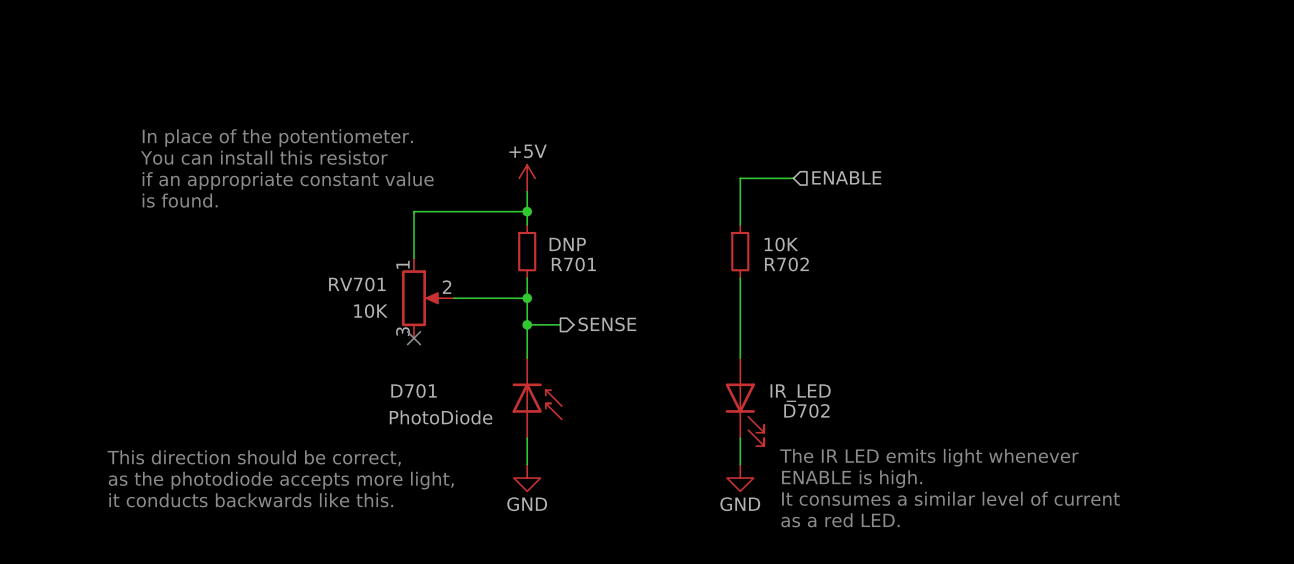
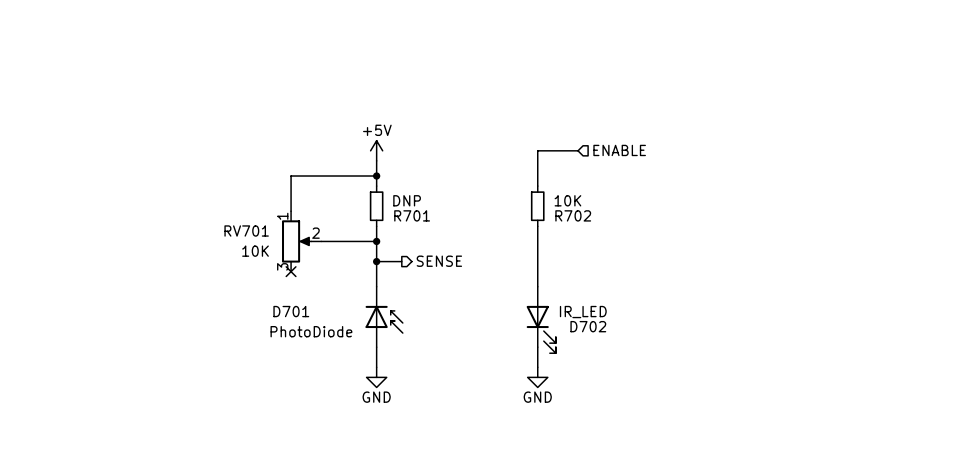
text: In place of the potentiometer. (277, 138) -> none
text: You can install this resistor (264, 157) -> none
text: if an appropriate constant value (288, 180) -> none
text: is found. (180, 200) -> none
text: The IR LED emits light whenever (929, 457) -> none
text: This direction should be correct, (254, 458) -> none
text: ENABLE is high. (852, 479) -> none
text: as the photodiode accepts more light, (281, 480) -> none
text: It consumes a similar level of current (950, 498) -> none
text: it conducts backwards like this. (251, 500) -> none
text: as a red LED. (840, 520) -> none

